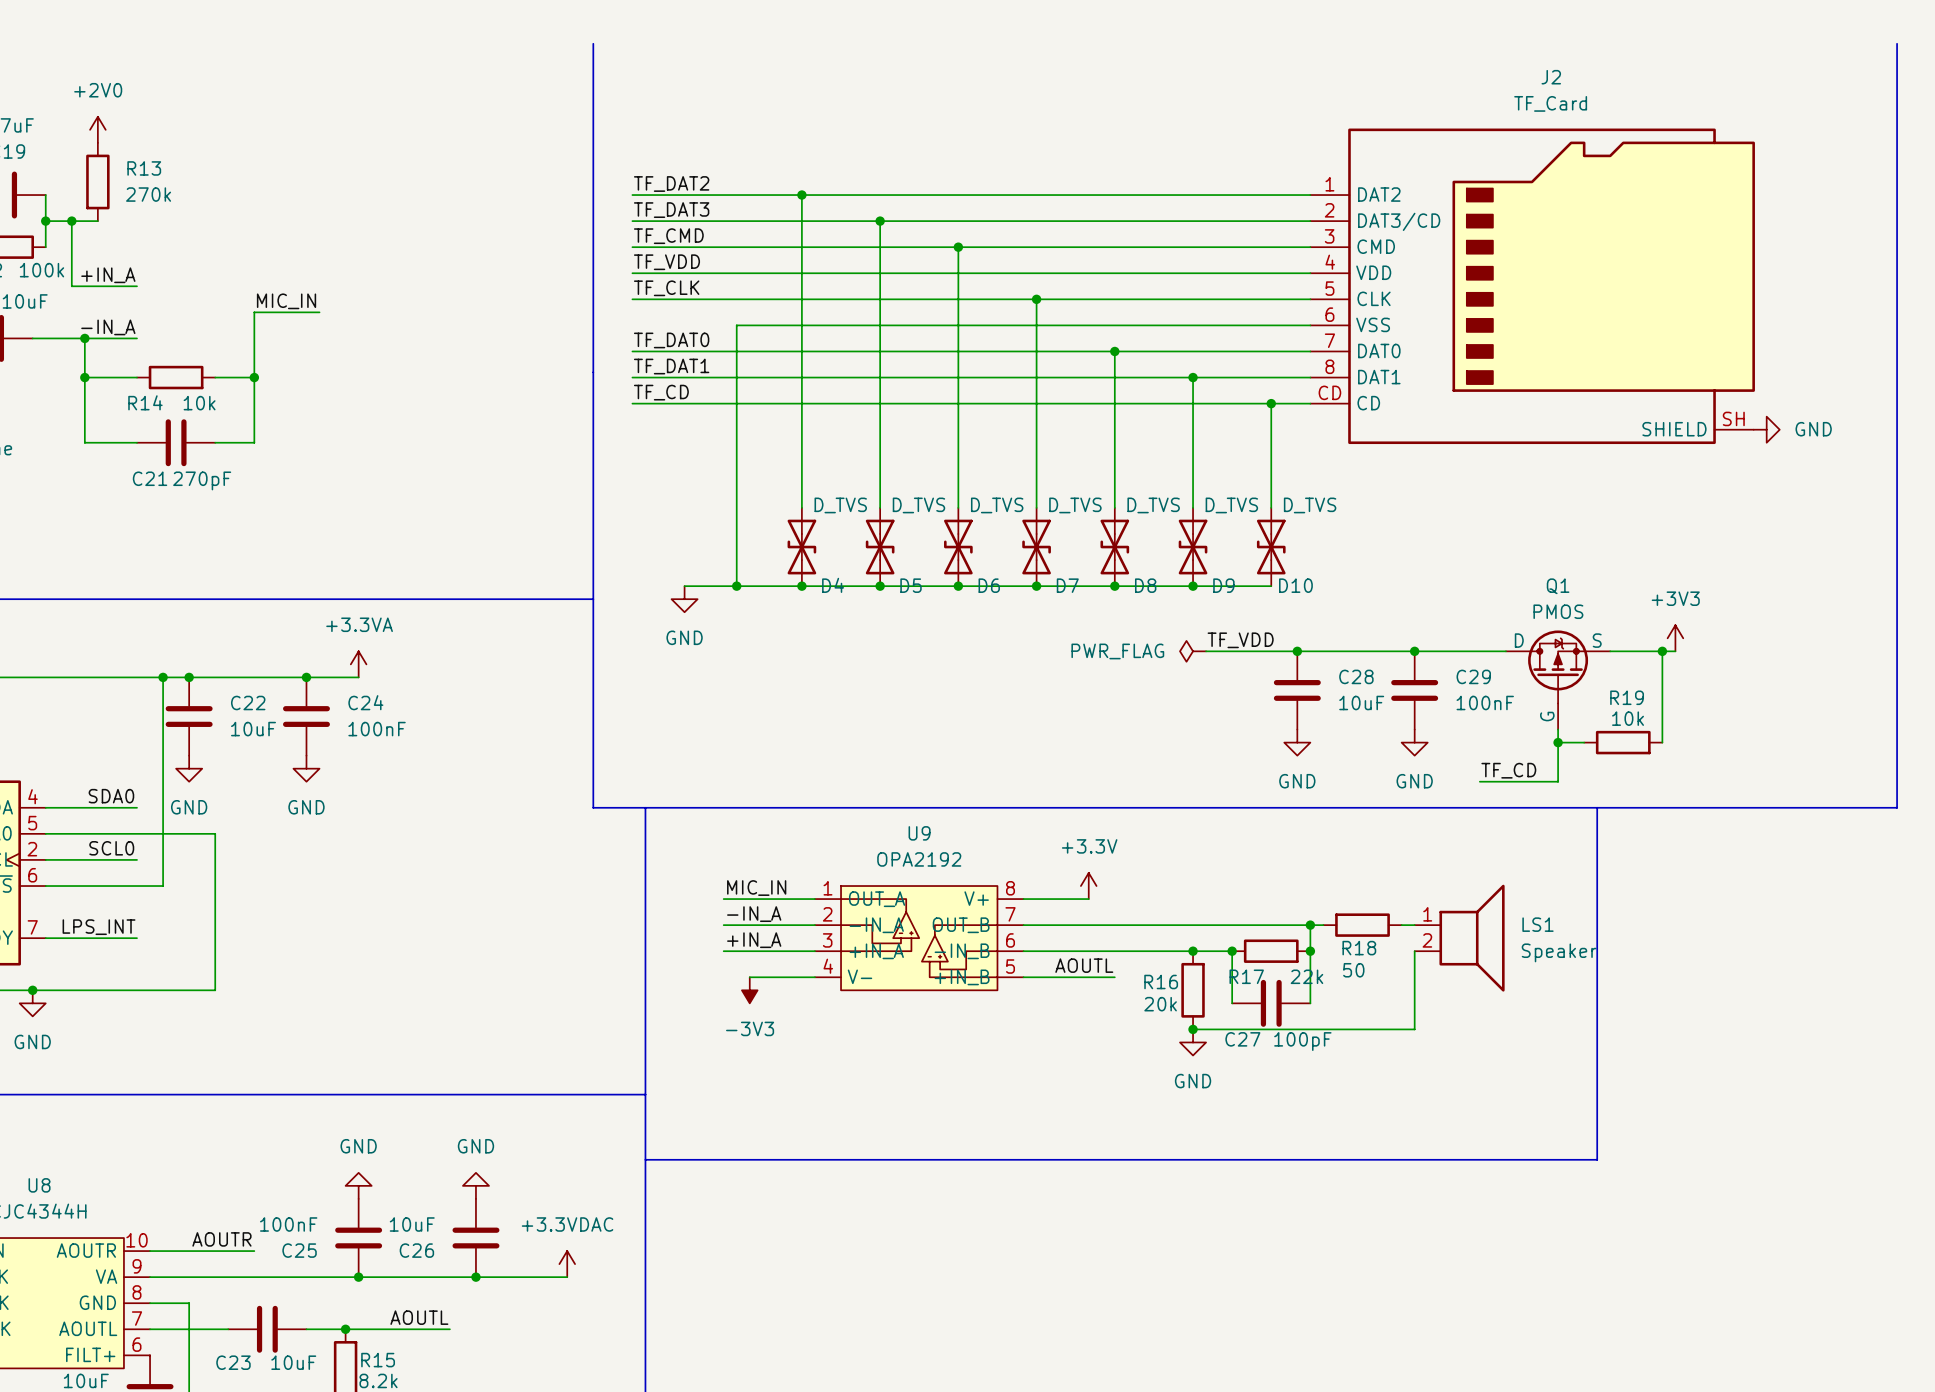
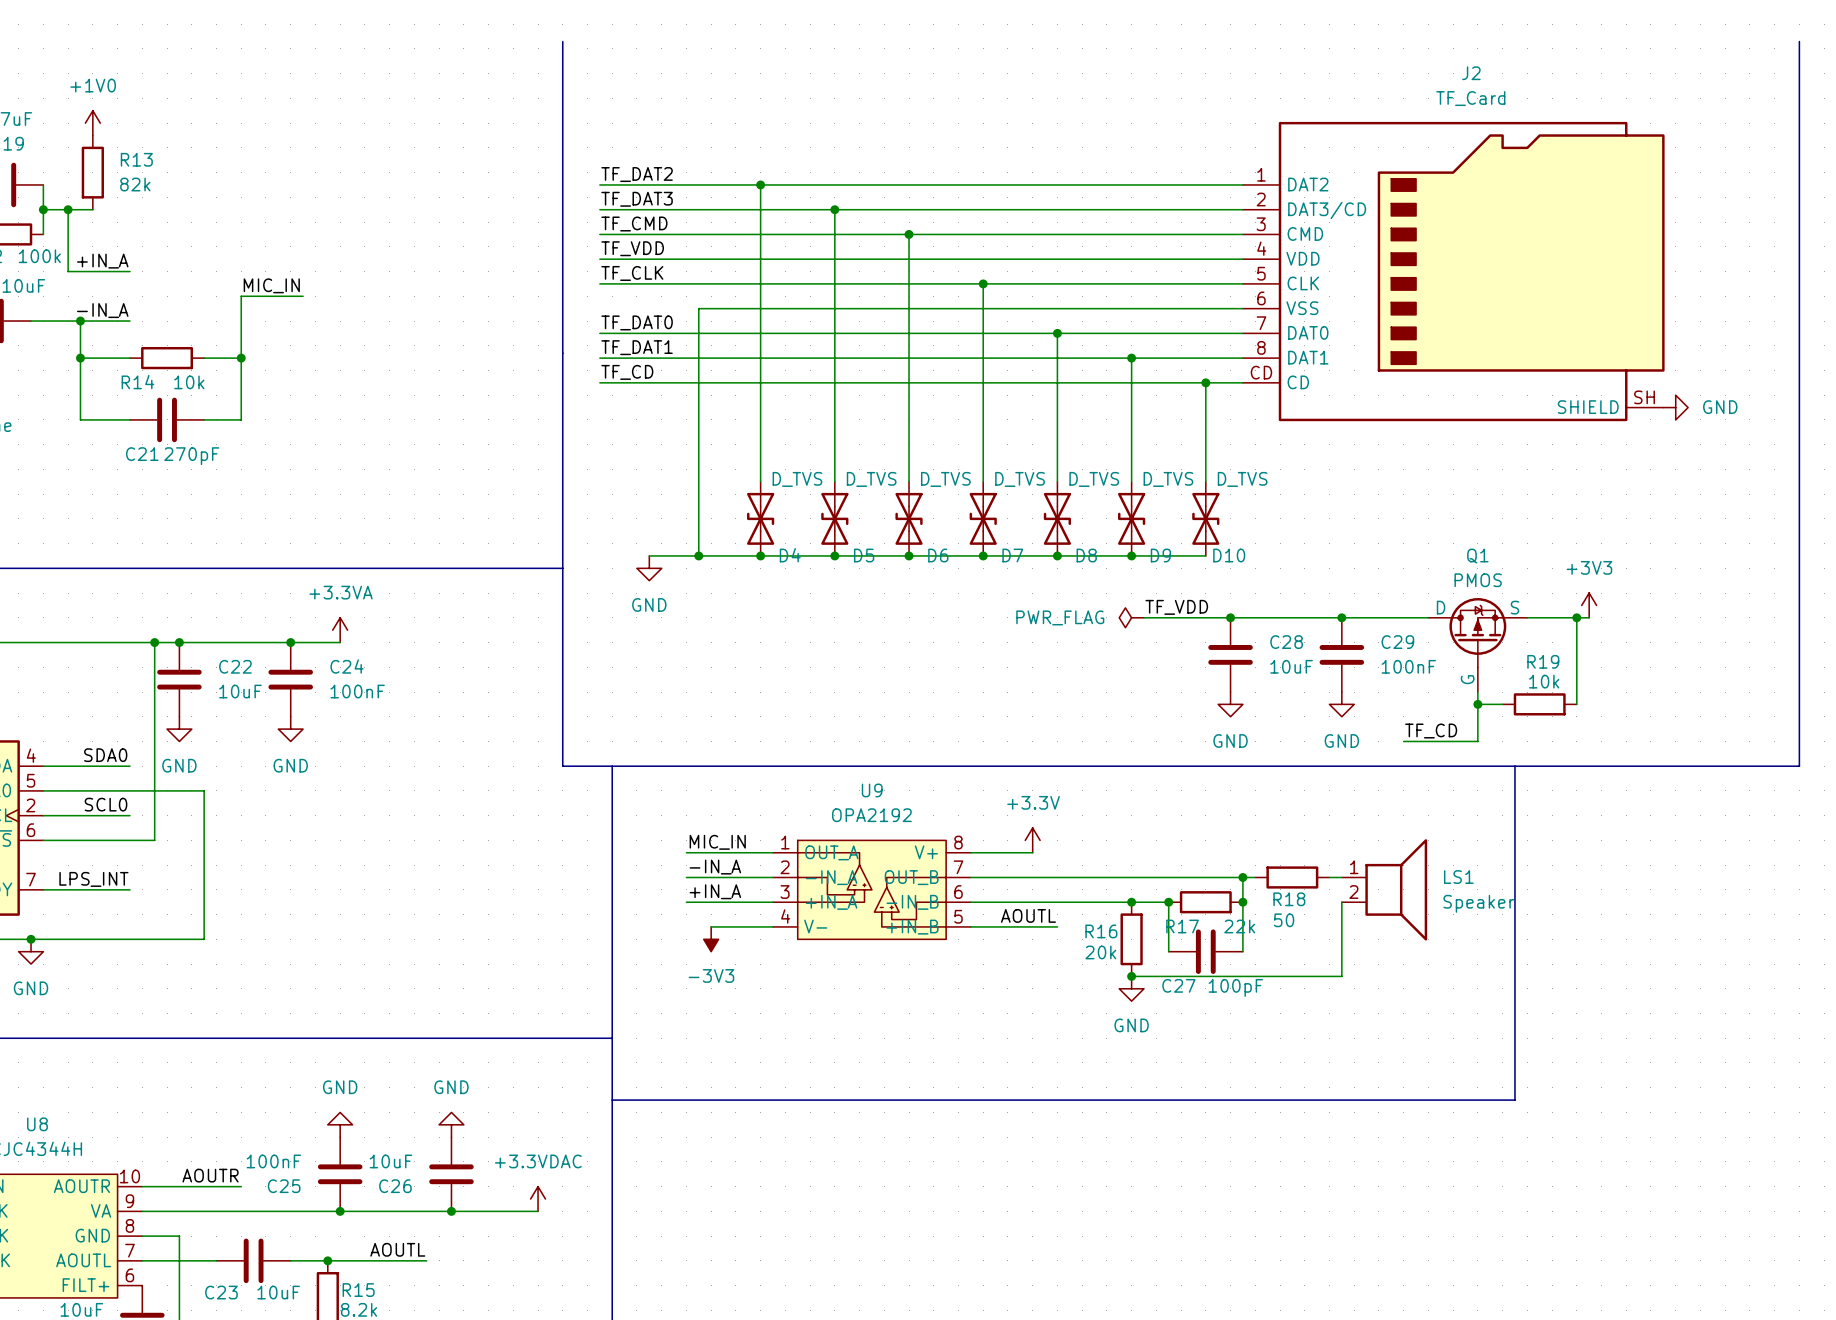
power symbol: +2V0 (97, 129) -> +1V0 (92, 123)
R13 value: 270k (148, 194) -> 82k (135, 184)

